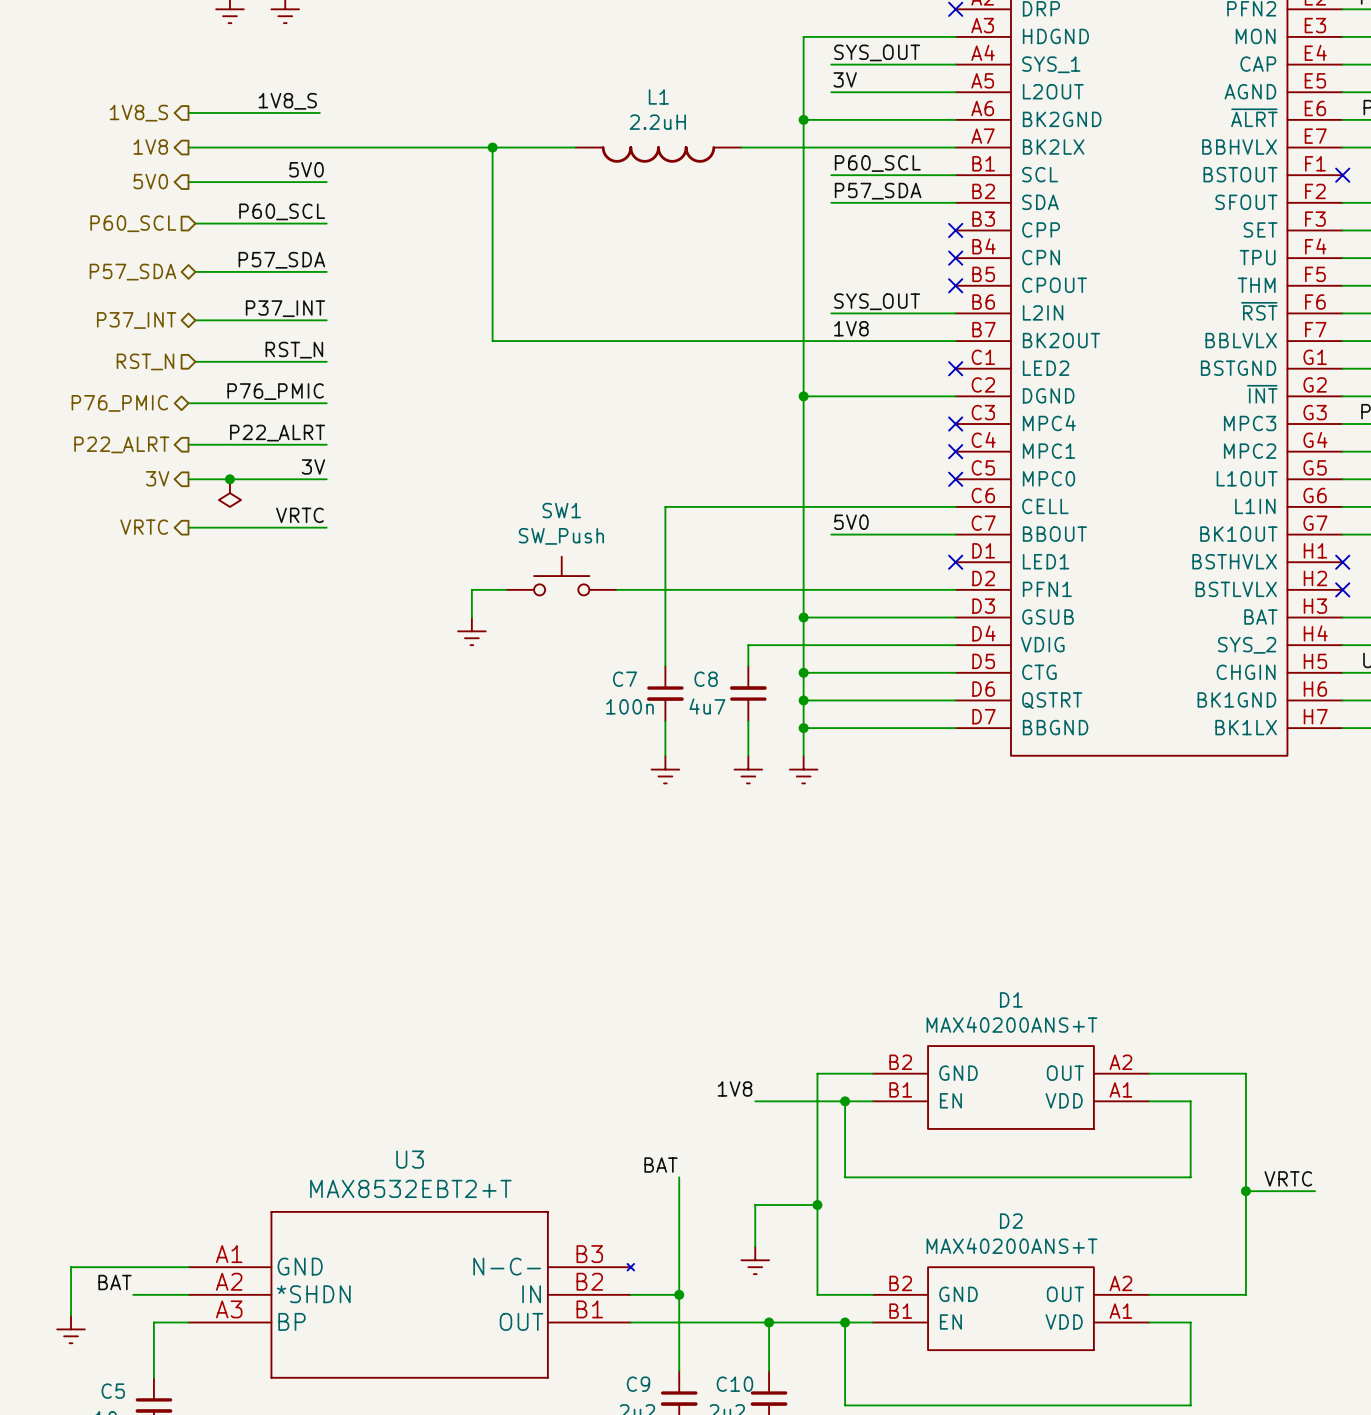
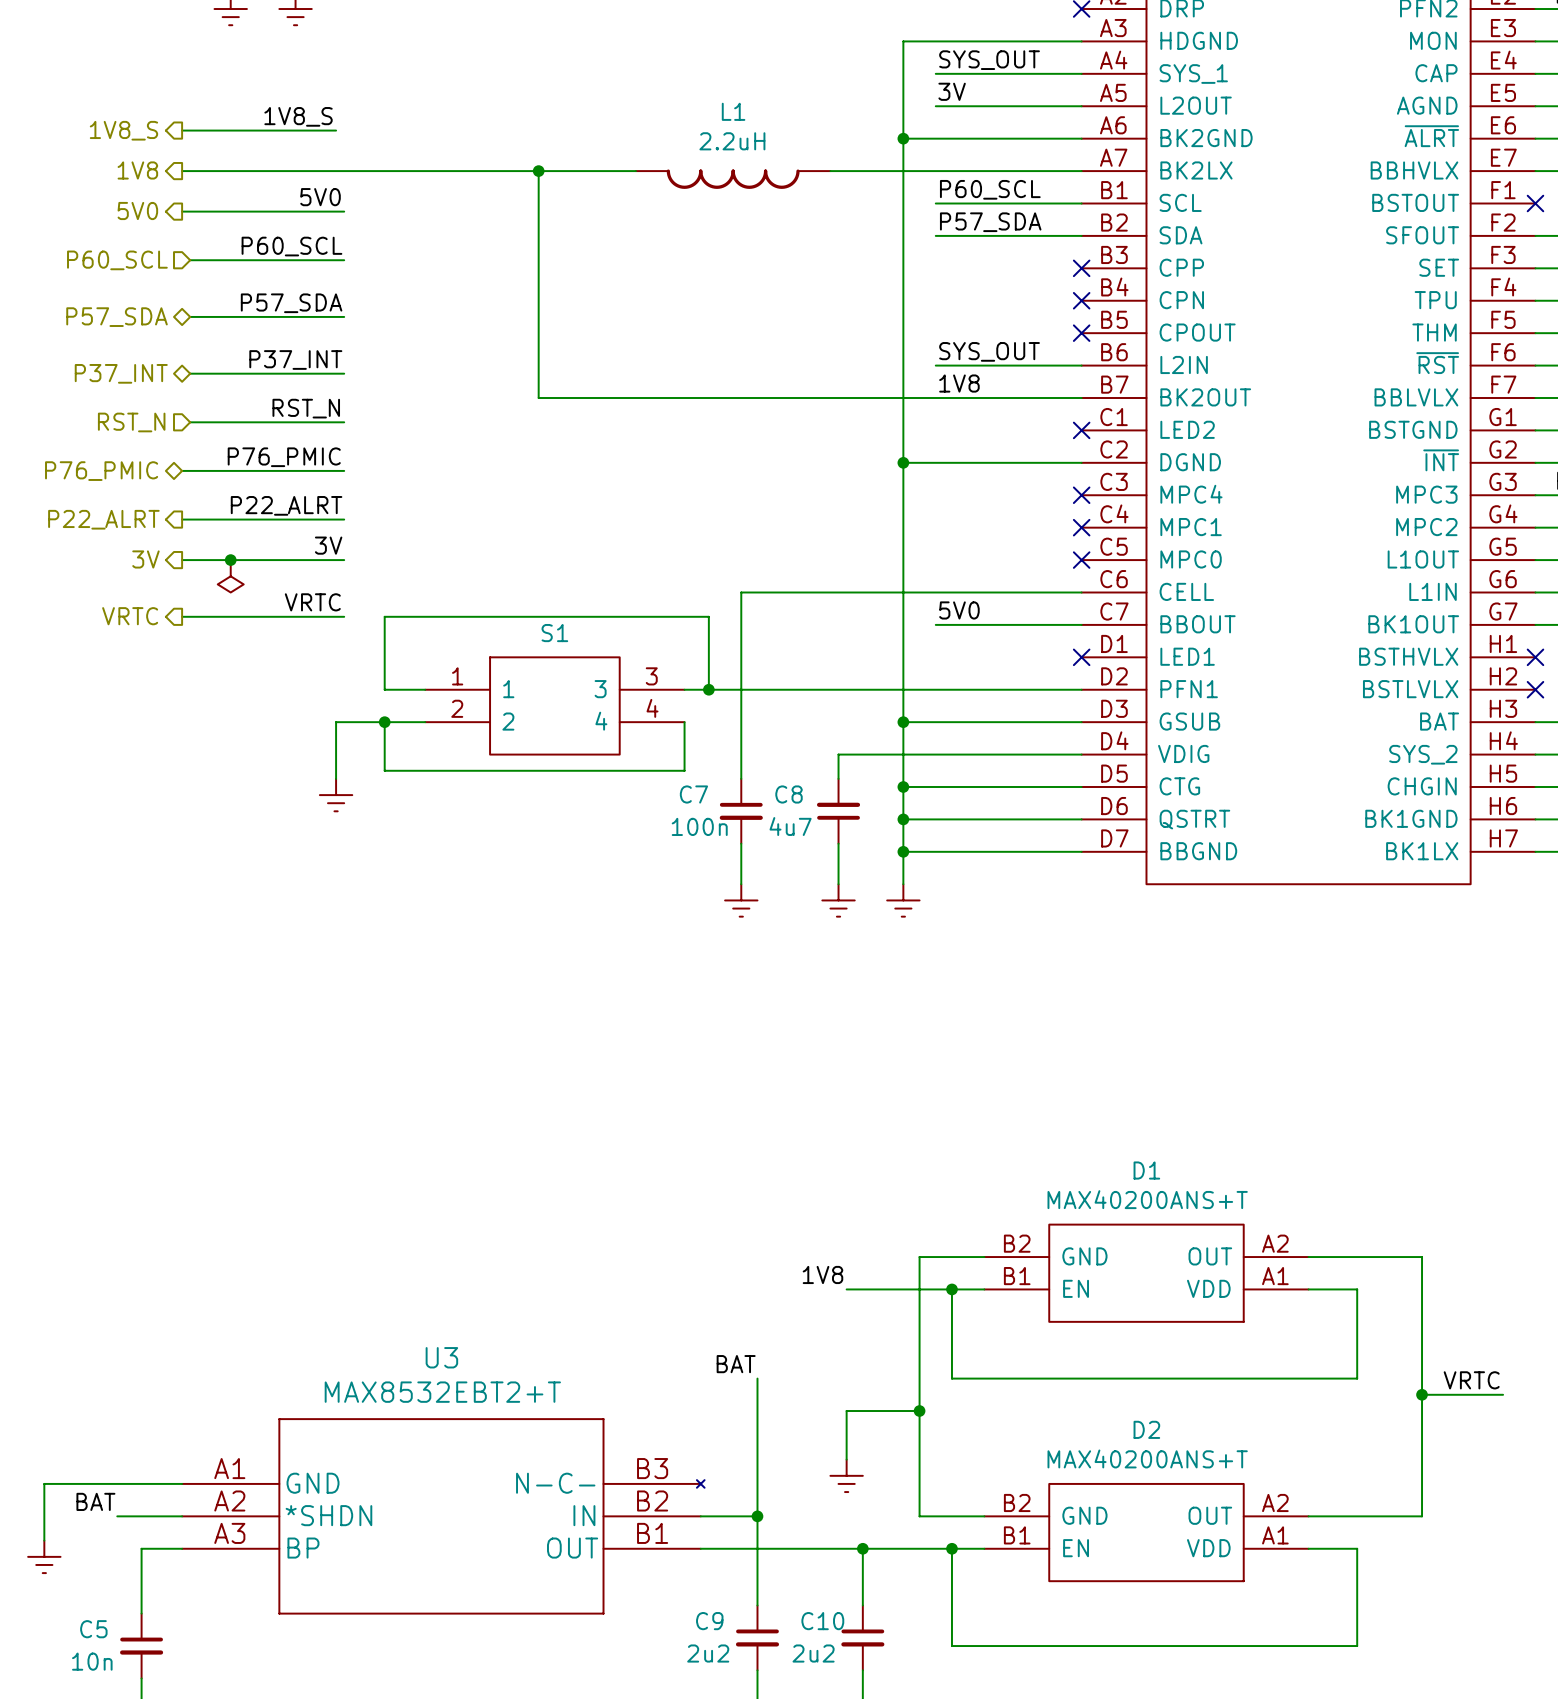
SW1: SW_Push (561, 576) -> none
wire: none -> (425, 689) (384, 689) (384, 616) (708, 616) (708, 689)
wire: (506, 589) (471, 589) (471, 617) -> none
junction: none -> (708, 689)
S1: none -> (554, 705)
wire: none -> (384, 722) (384, 770) (684, 770) (684, 722)
junction: none -> (384, 722)
wire: none -> (425, 722) (336, 722) (336, 778)
power symbol position: (471, 631) -> (336, 795)

